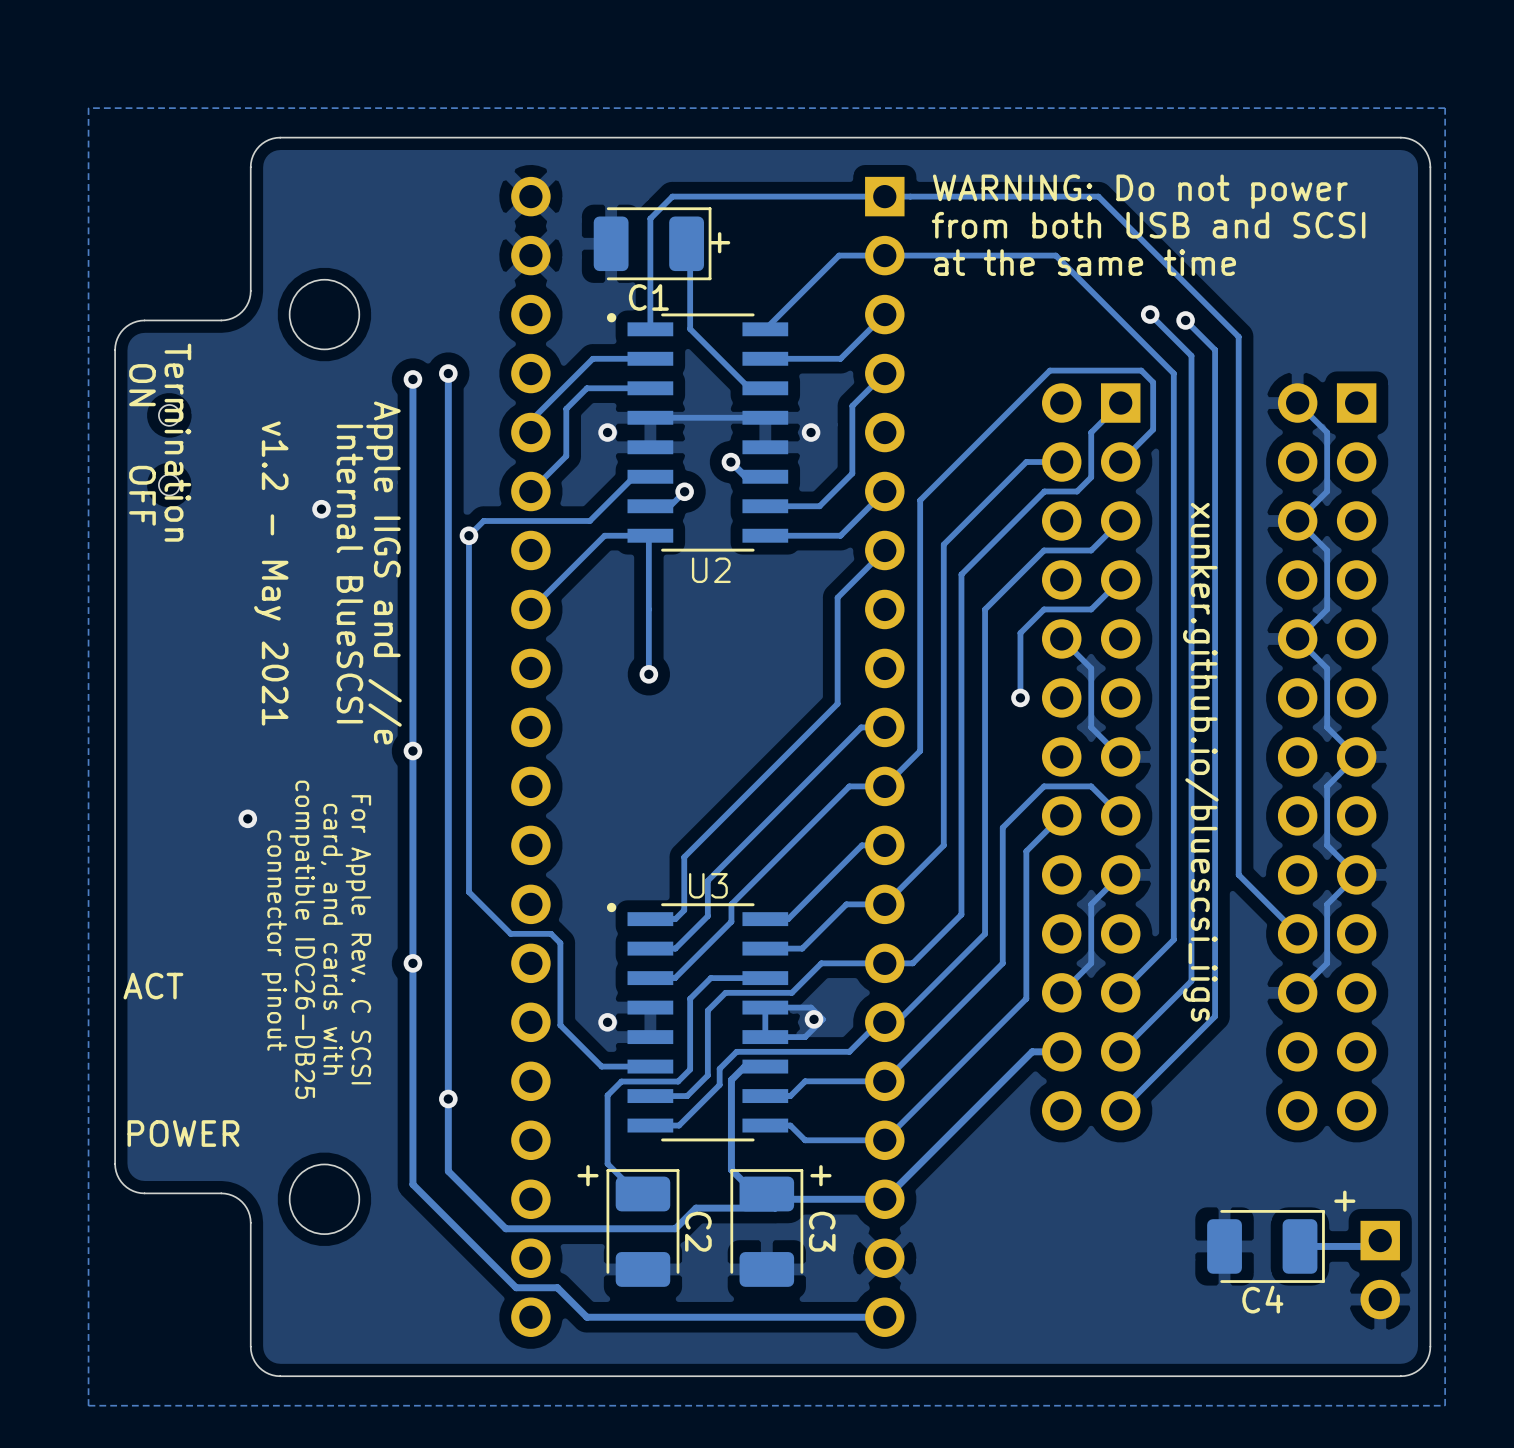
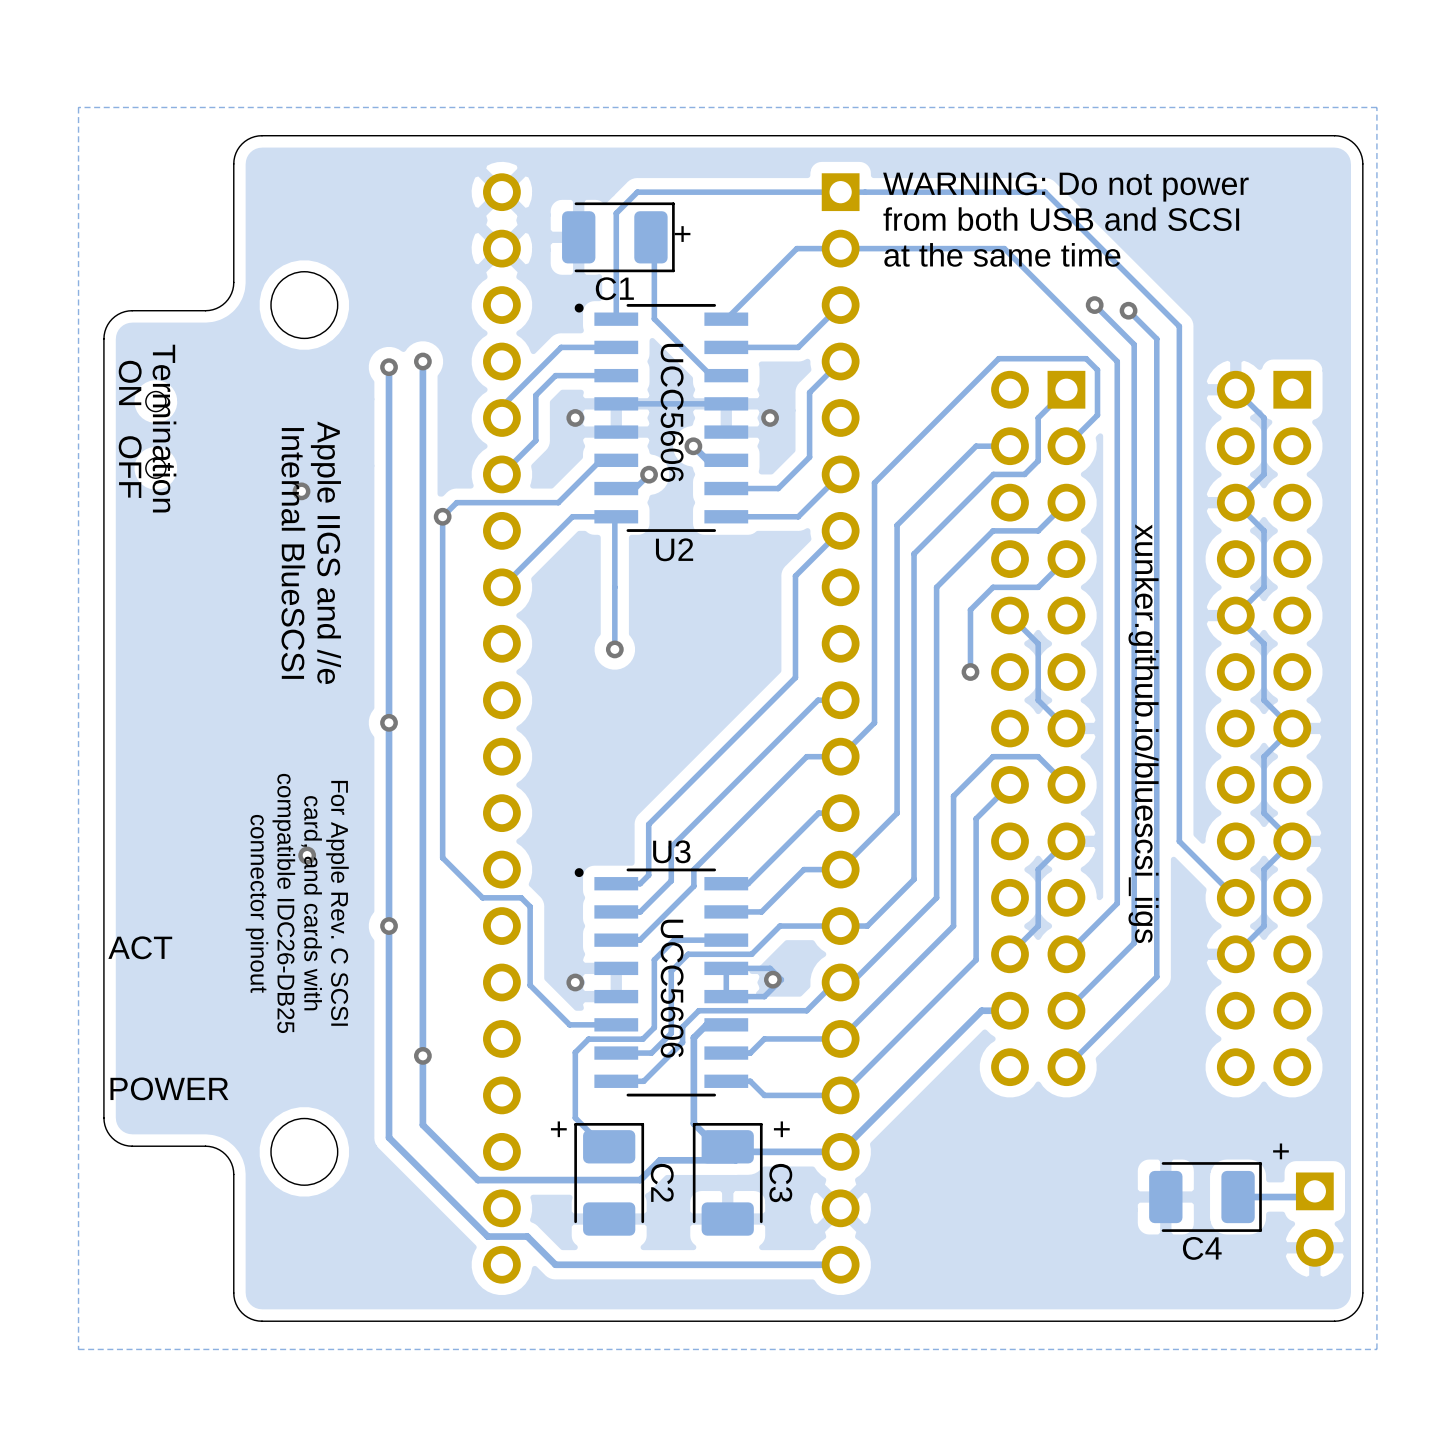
text: none -> UCC5606 (672, 412)
text: Apple IIGS and //e (384, 572) -> none
text: v1.2 - May 2021 (271, 573) -> none
text: none -> Internal BlueSCSI (293, 553)
text: Internal BlueSCSI (349, 574) -> Apple IIGS and //e (325, 552)
via position: (247, 818) -> (307, 855)
text: none -> UCC5606 (672, 988)

